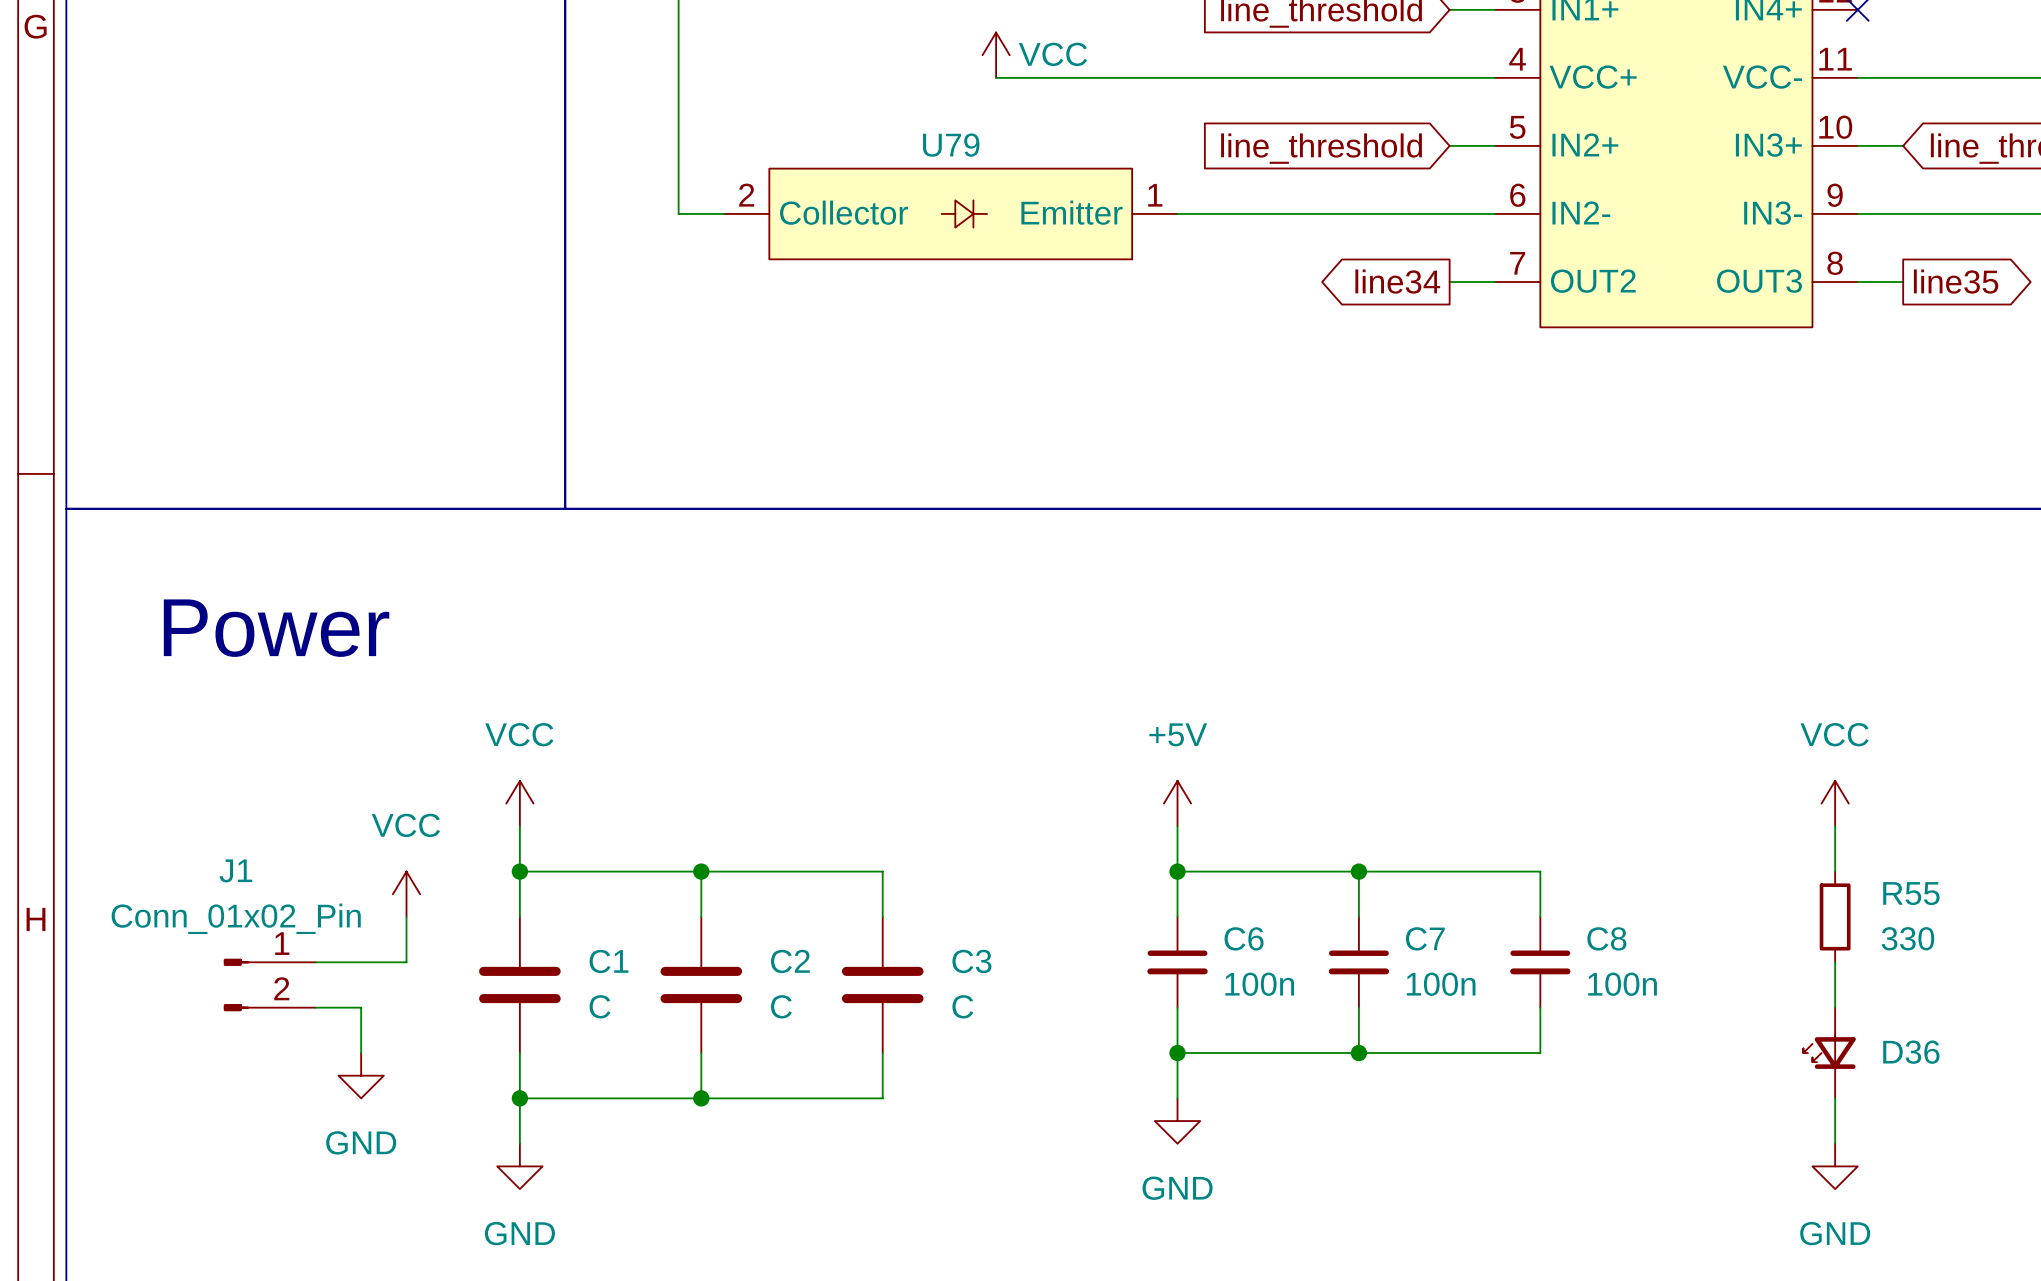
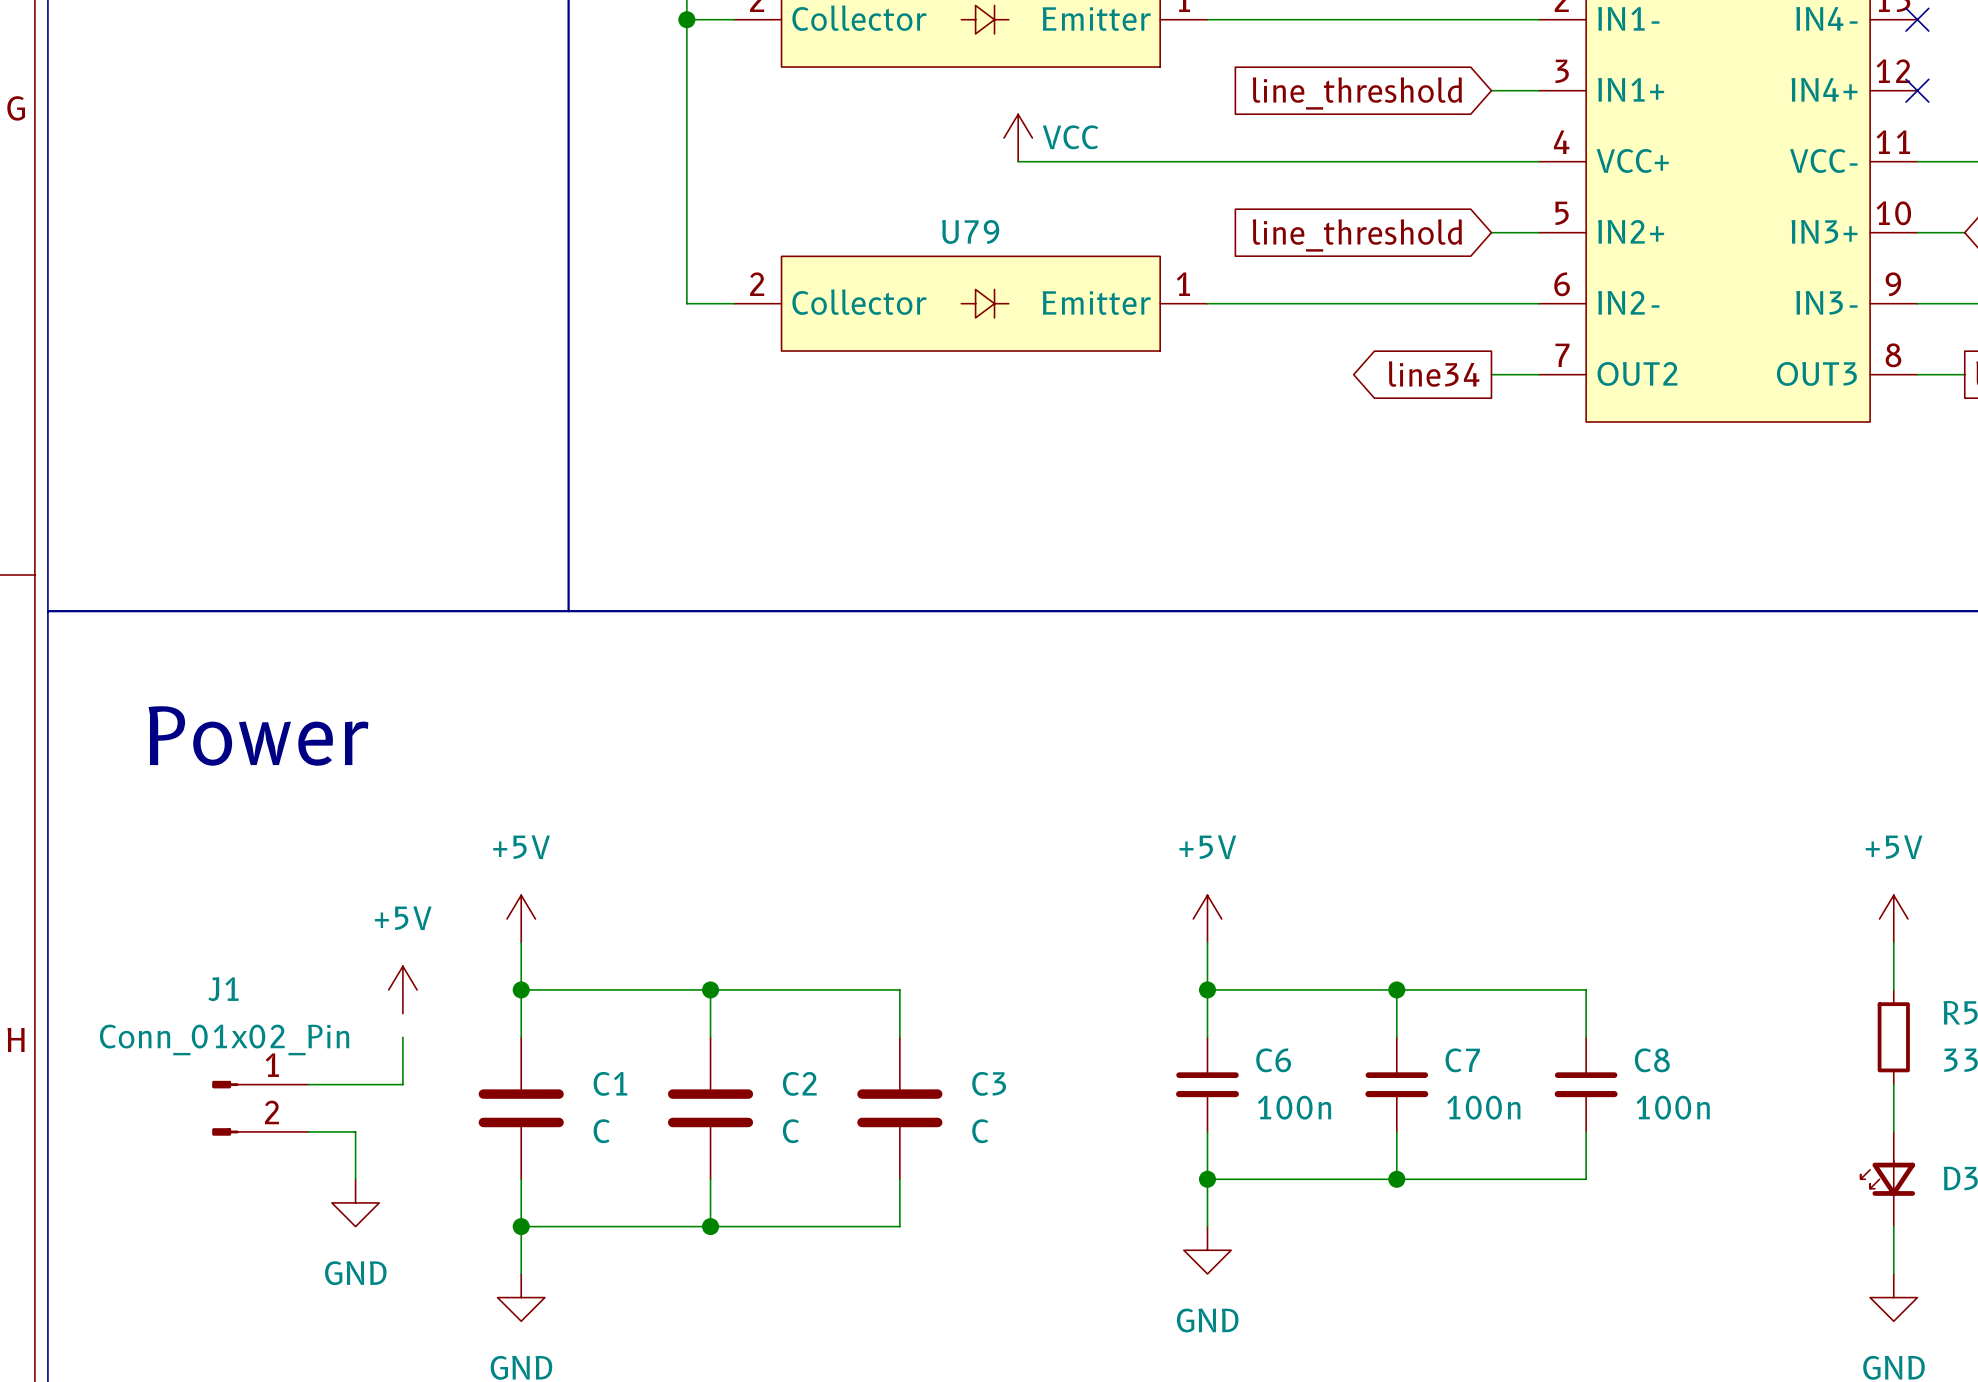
power symbol: VCC (519, 803) -> +5V (521, 918)
power symbol: VCC (1835, 803) -> +5V (1893, 918)
power symbol: none -> +5V (402, 989)
power symbol: VCC (406, 894) -> none

